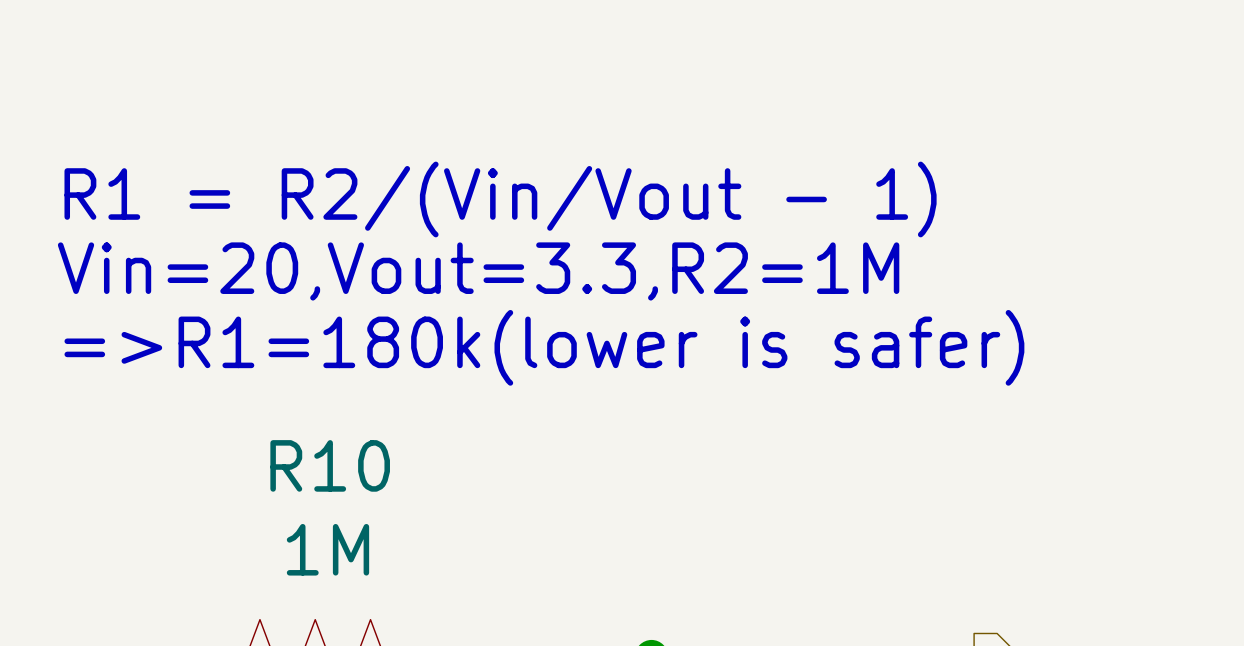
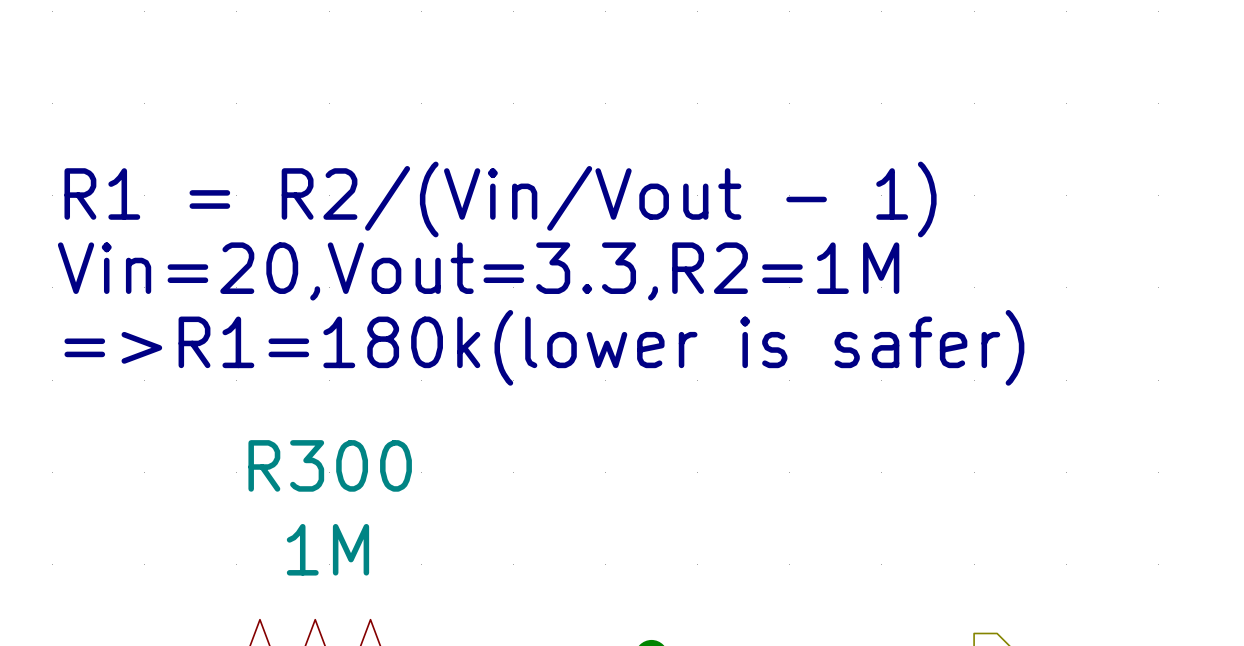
R10 name: R10 (330, 465) -> R300 (330, 465)

